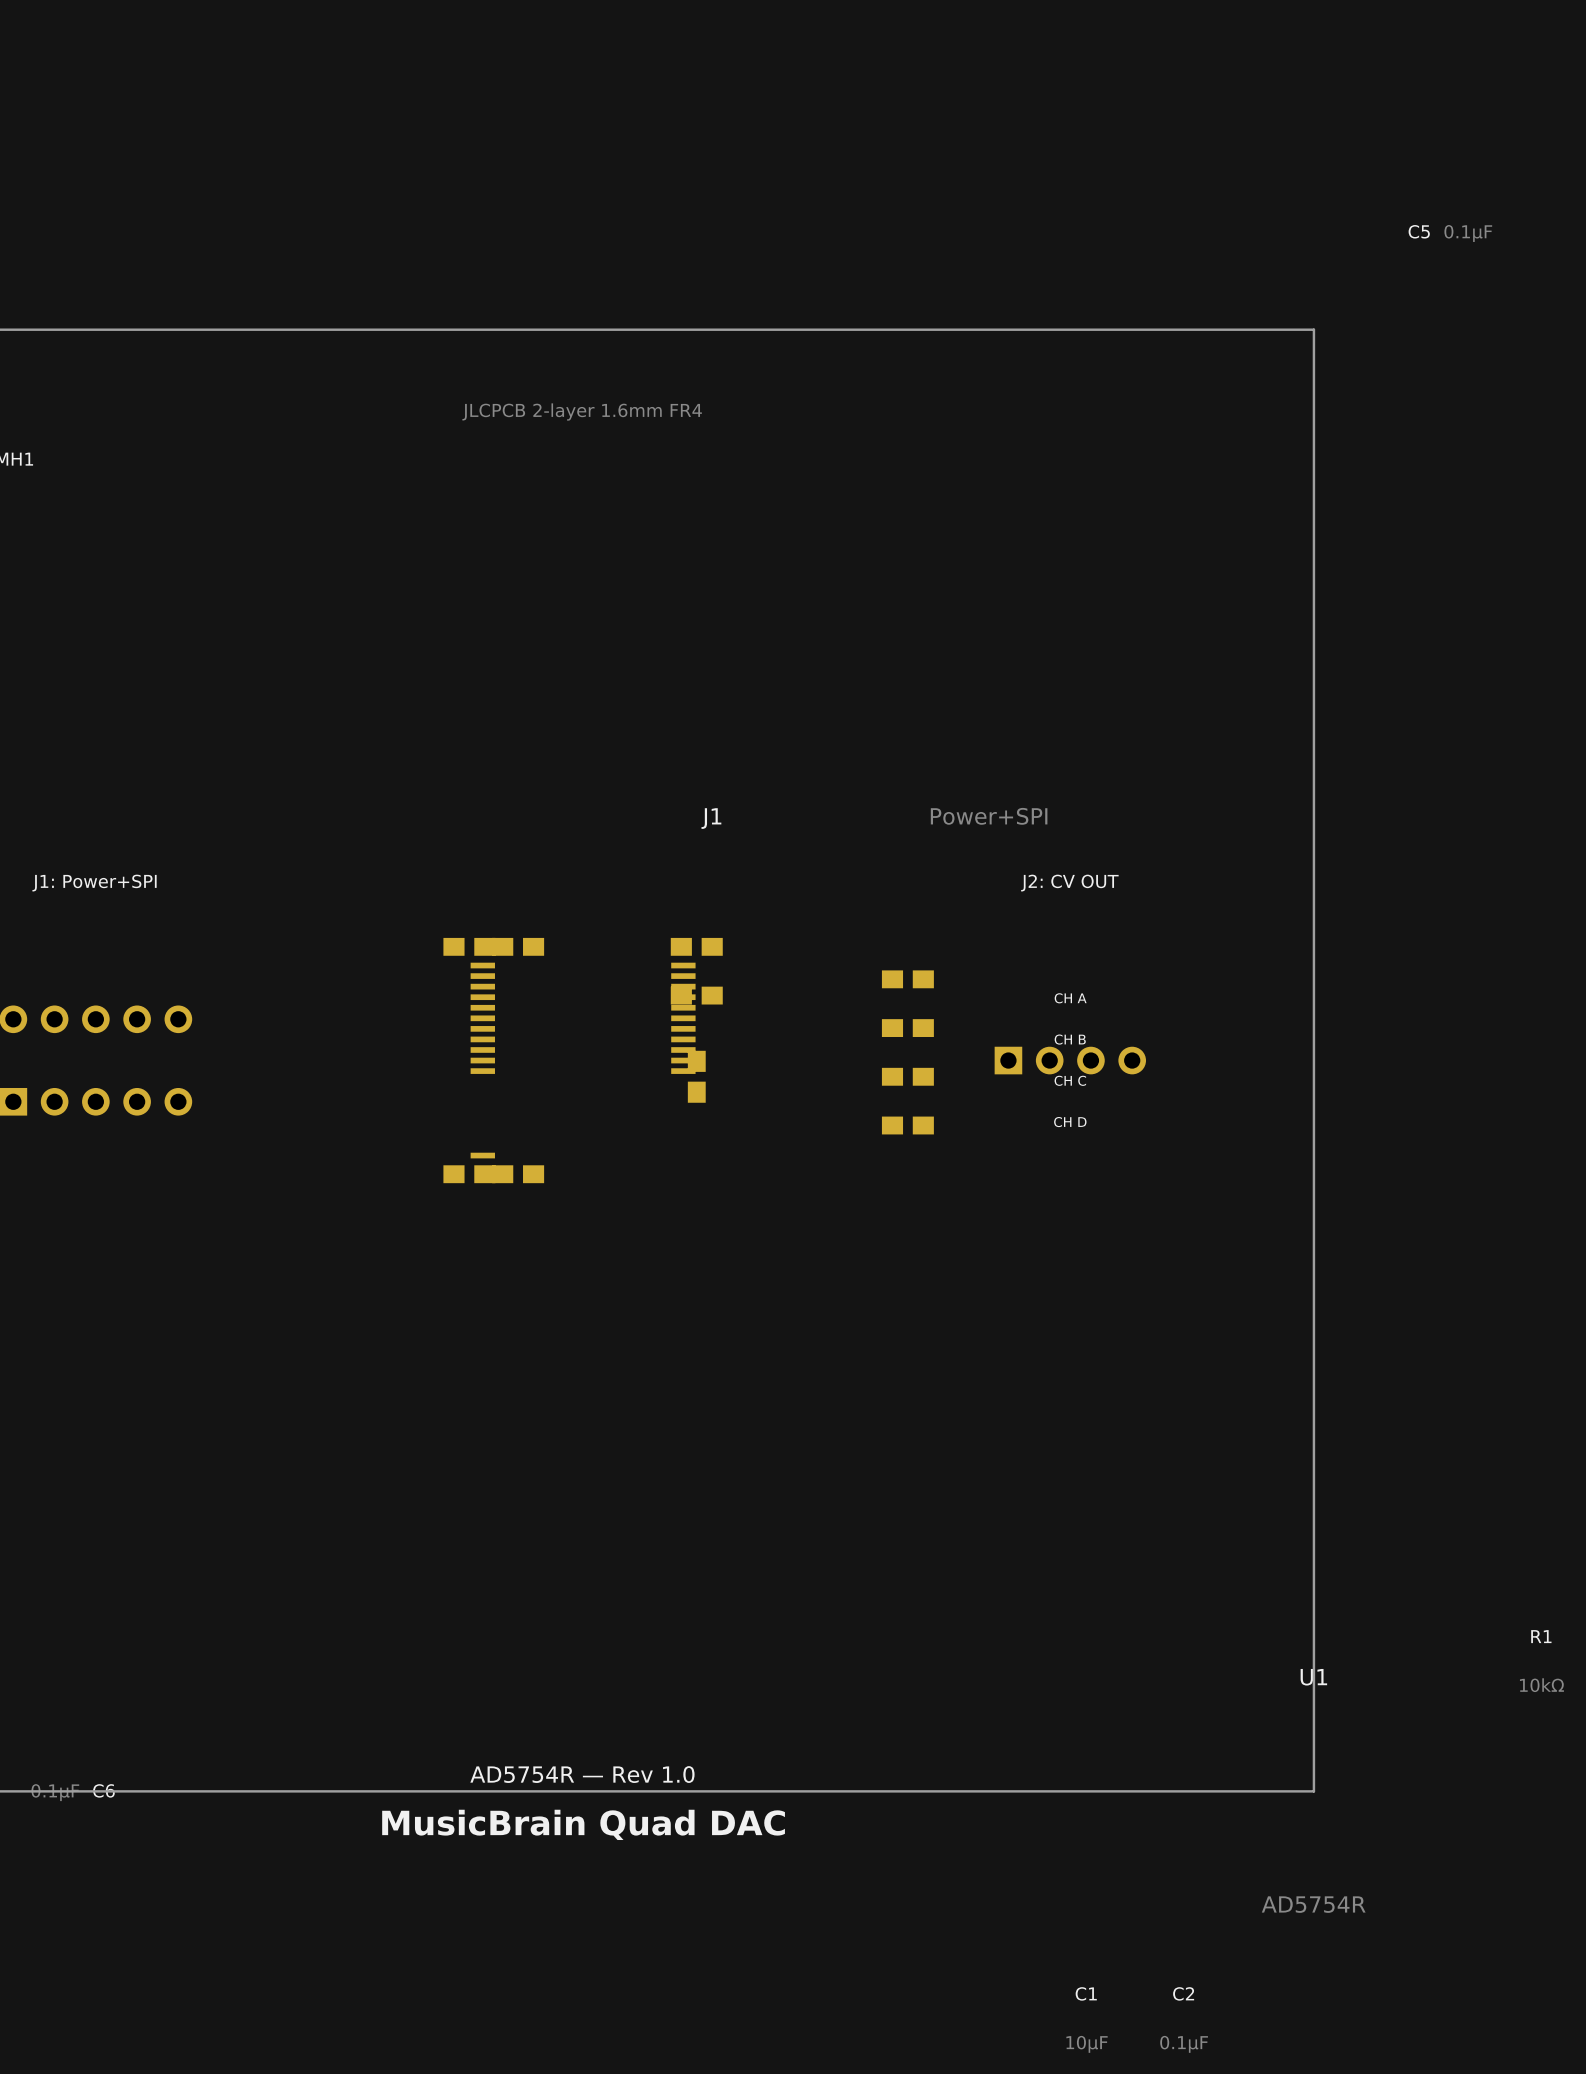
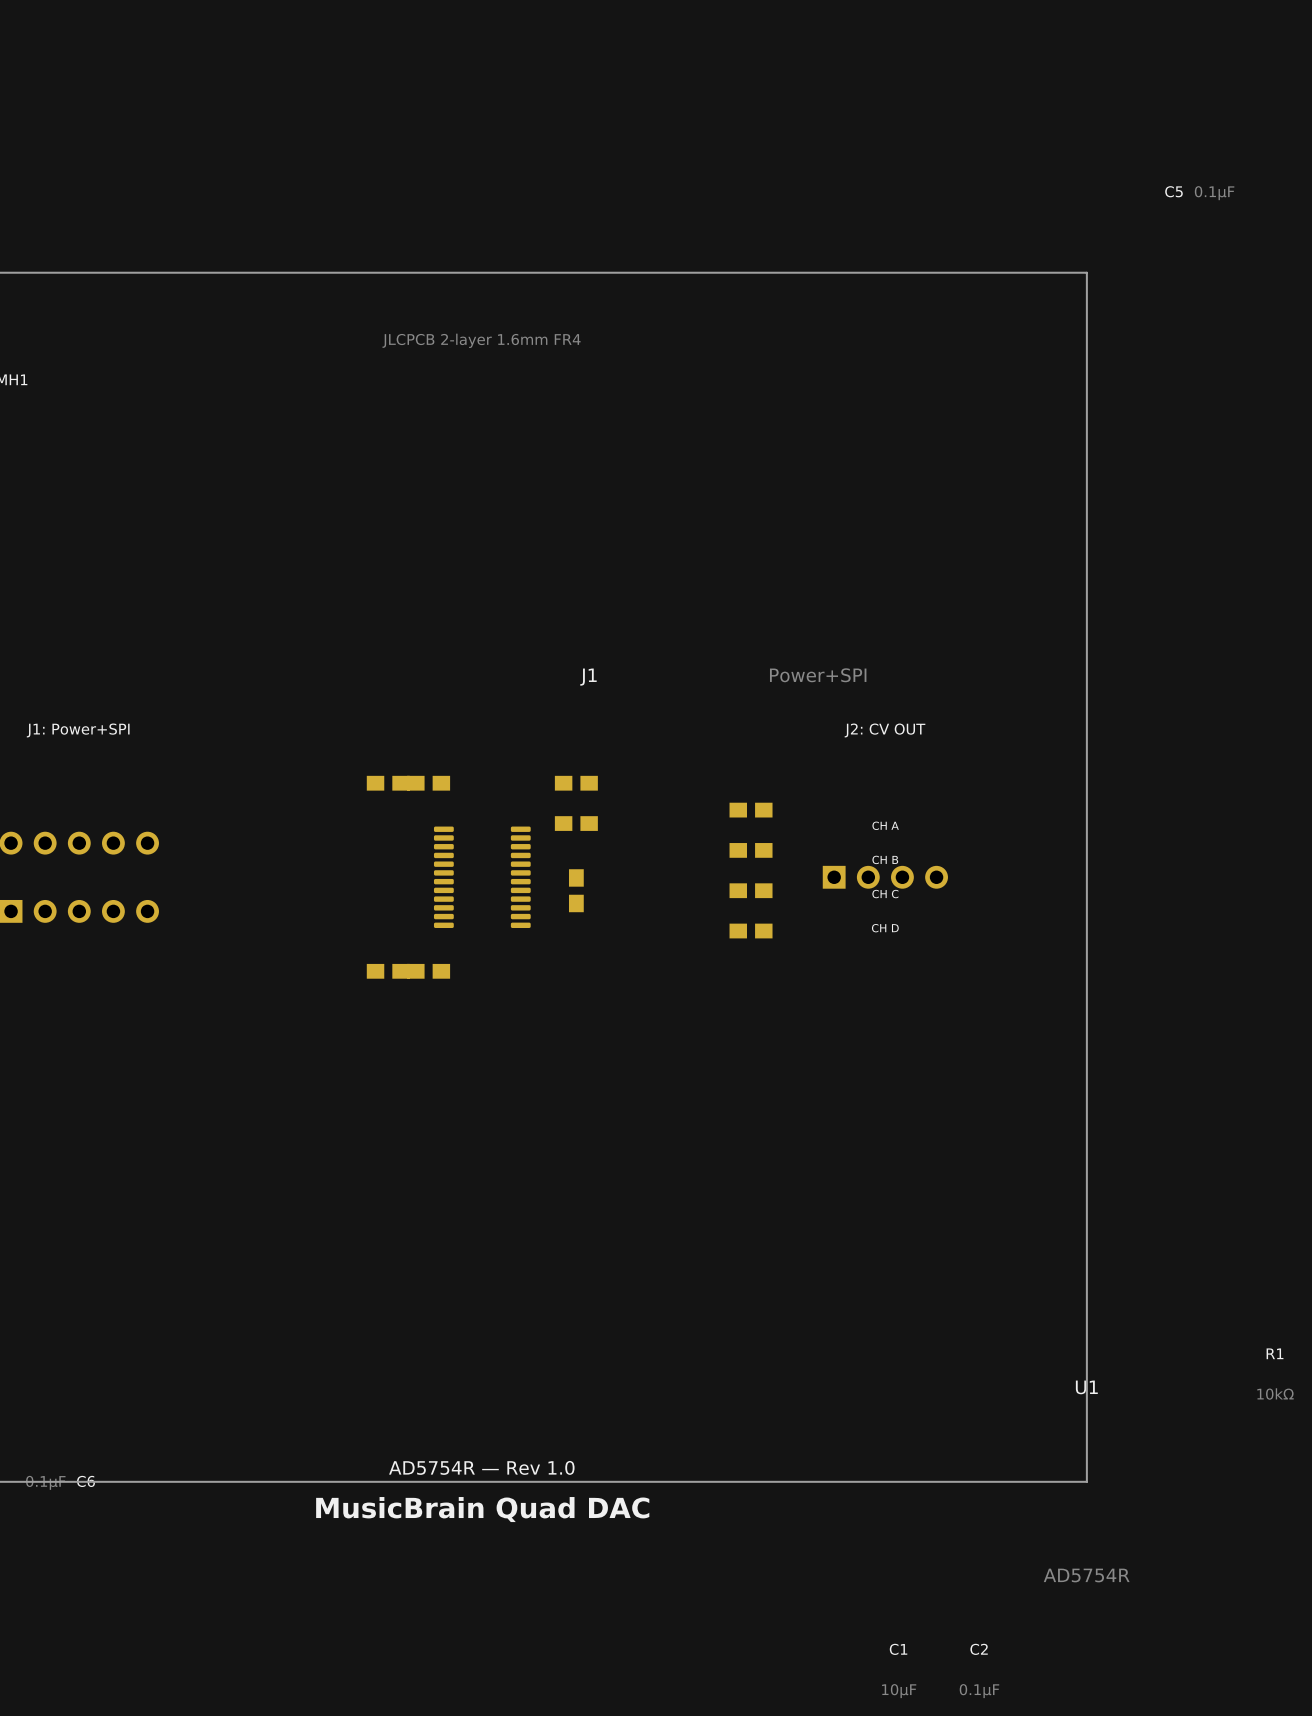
U1 footprint: [470, 962, 696, 1159] -> [433, 826, 531, 928]

